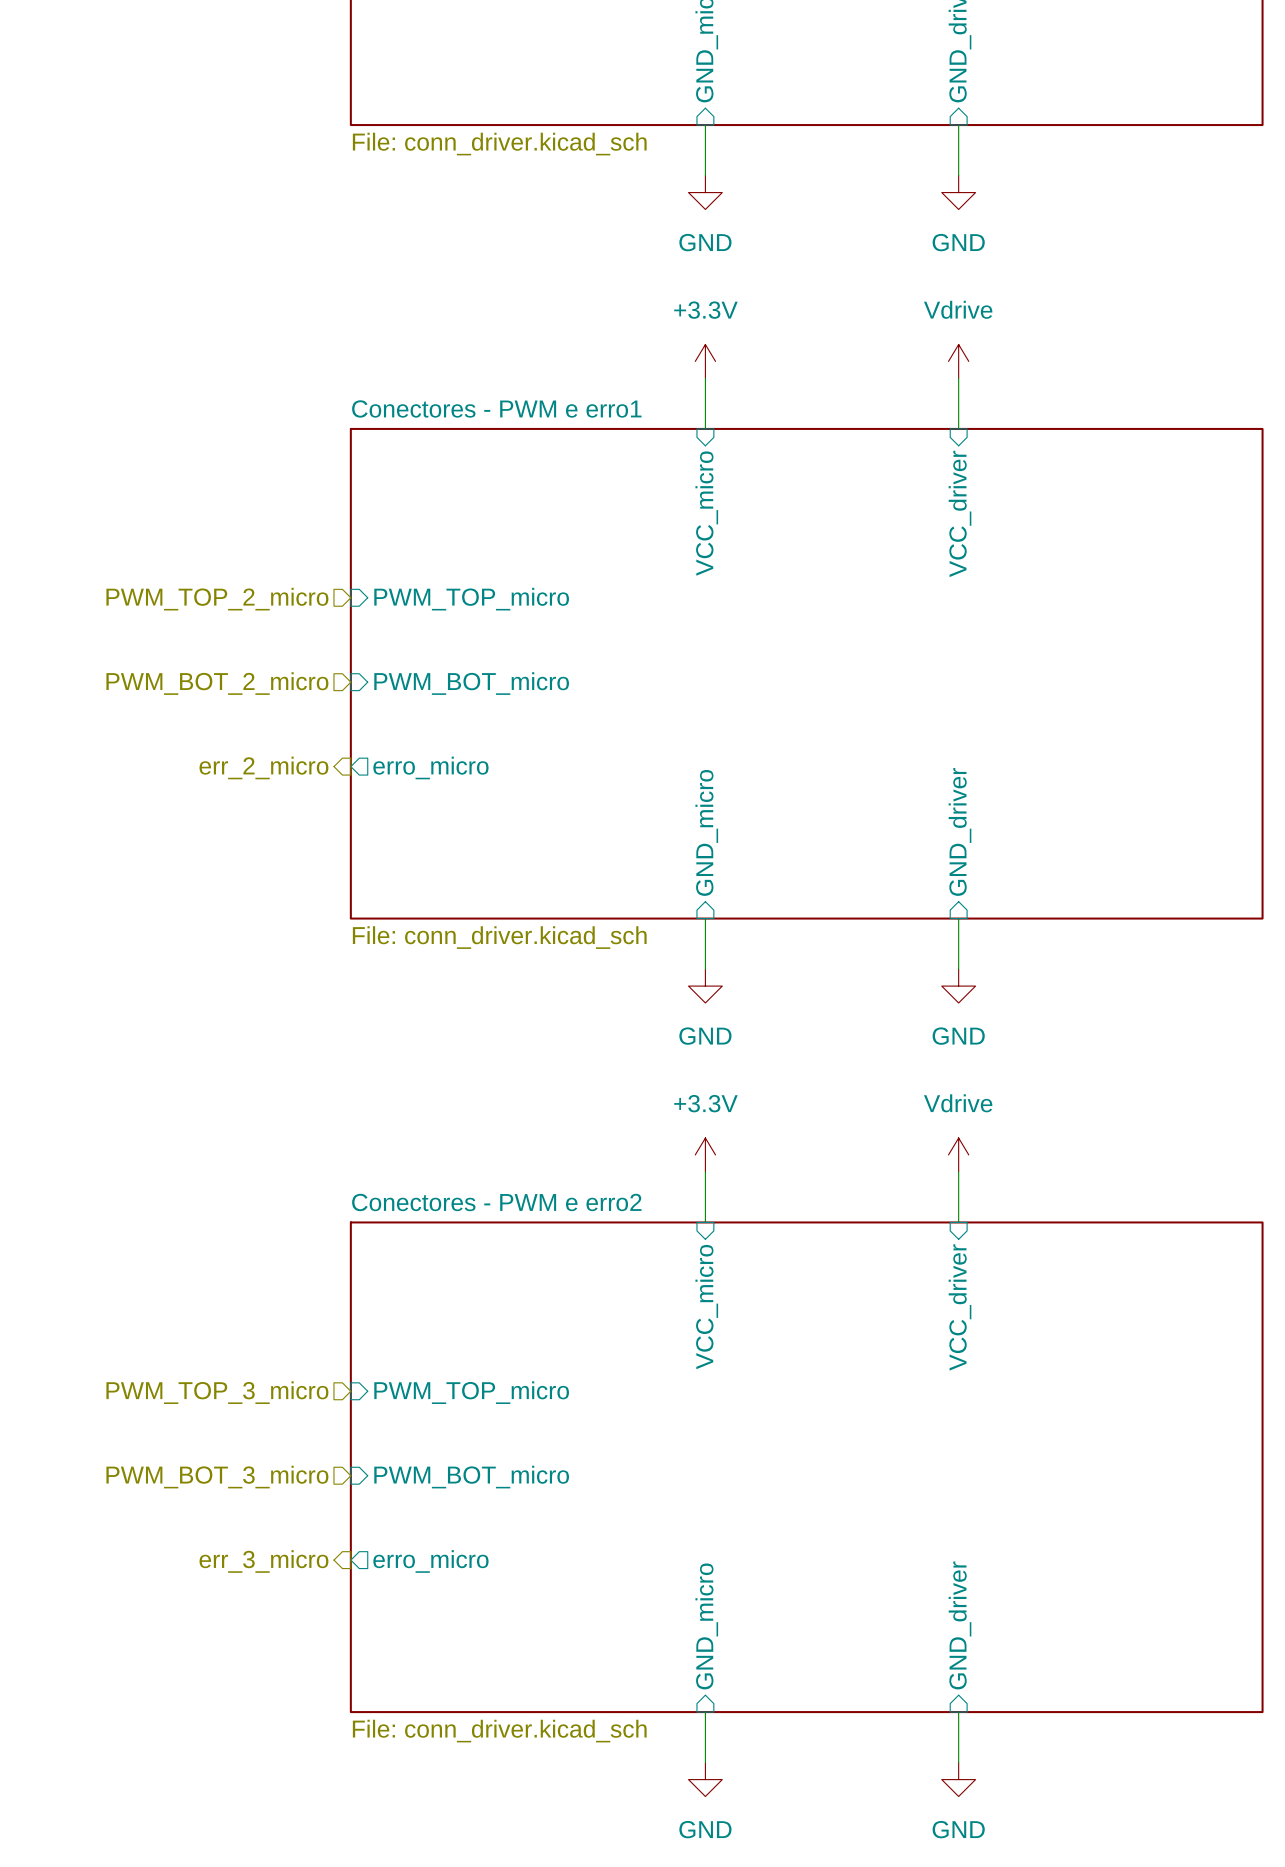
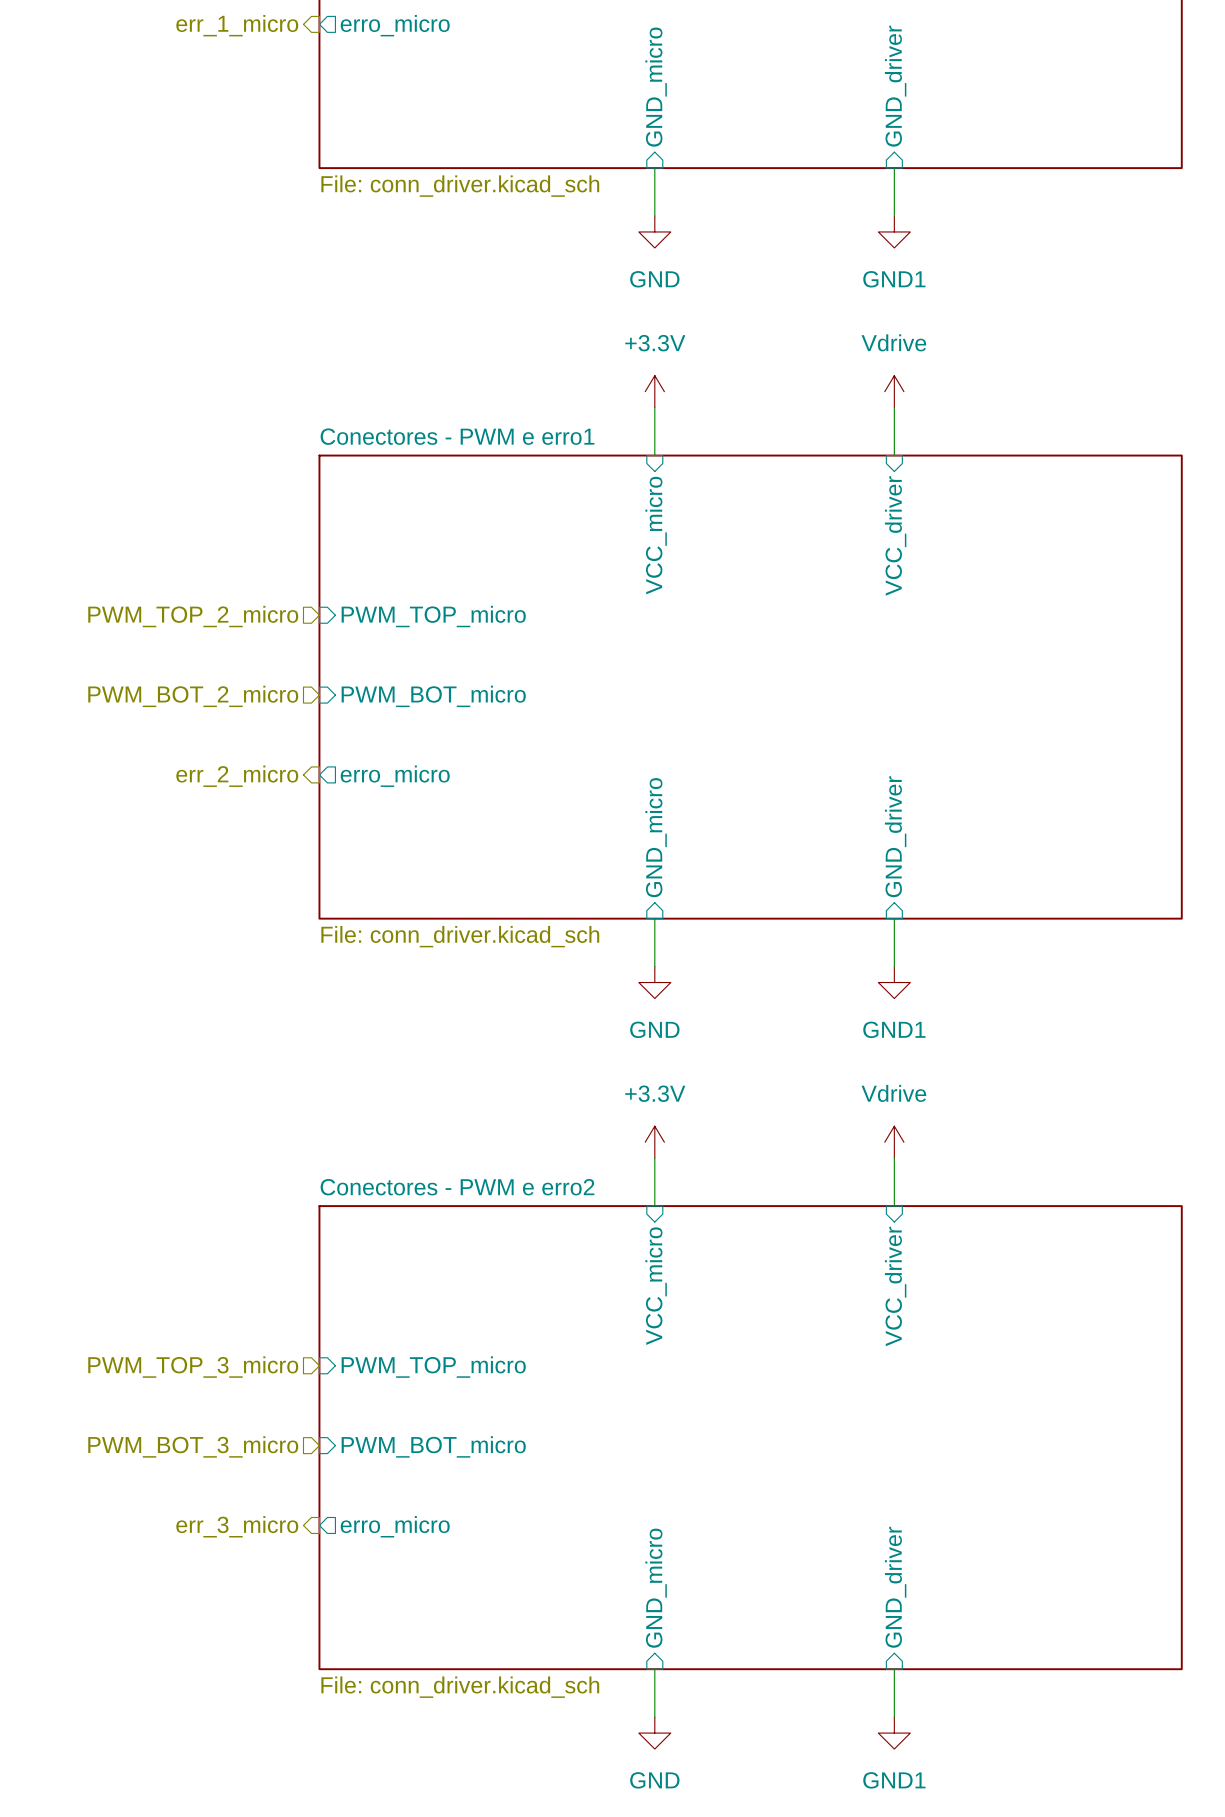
power symbol: GND (958, 192) -> GND1 (894, 231)
power symbol: GND (958, 986) -> GND1 (894, 982)
power symbol: GND (958, 1779) -> GND1 (894, 1733)

